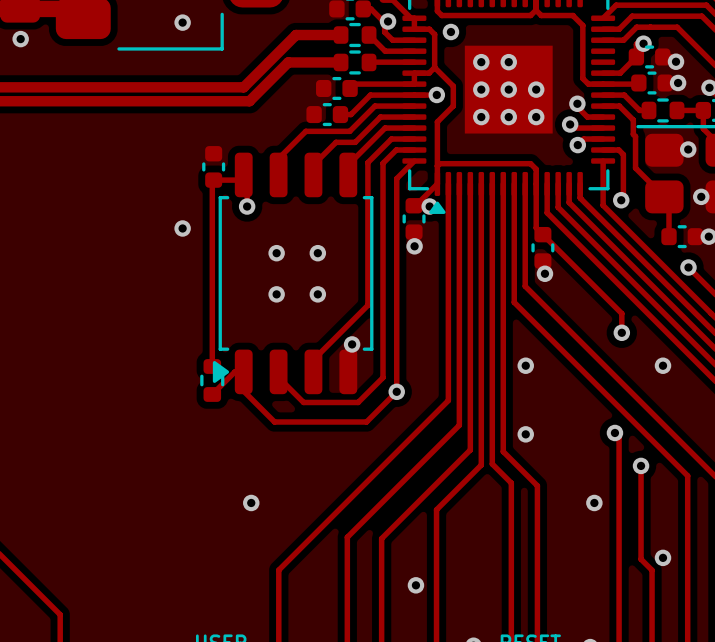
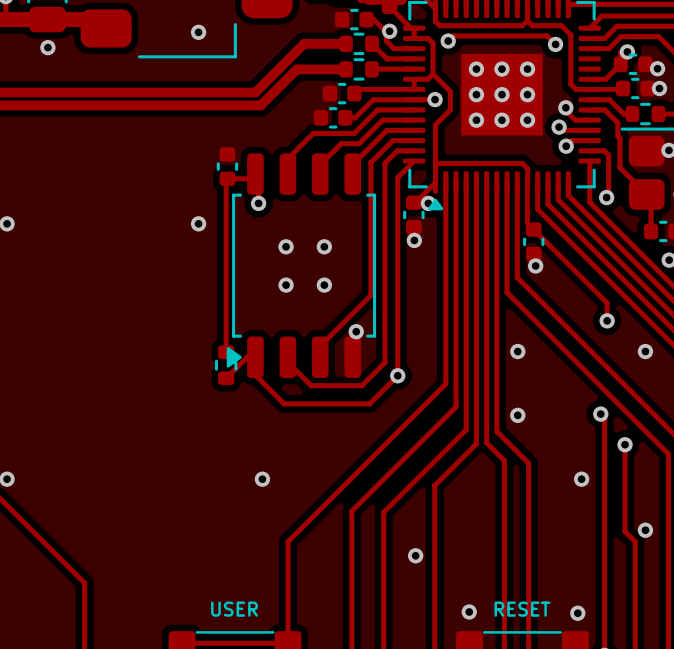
track: none -> (448, 41) (453, 35) (547, 35) (555, 44)
via: none -> (555, 44)
via: none -> (527, 69)

